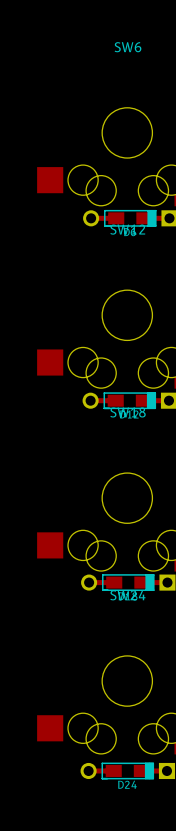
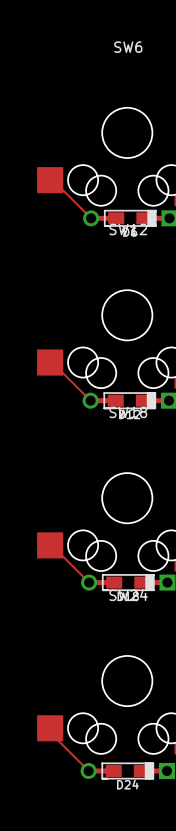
track: none -> (50, 180) (52, 180) (91, 218)
track: none -> (50, 362) (52, 362) (90, 400)
track: none -> (50, 545) (89, 582)
track: none -> (50, 728) (50, 732) (88, 770)

